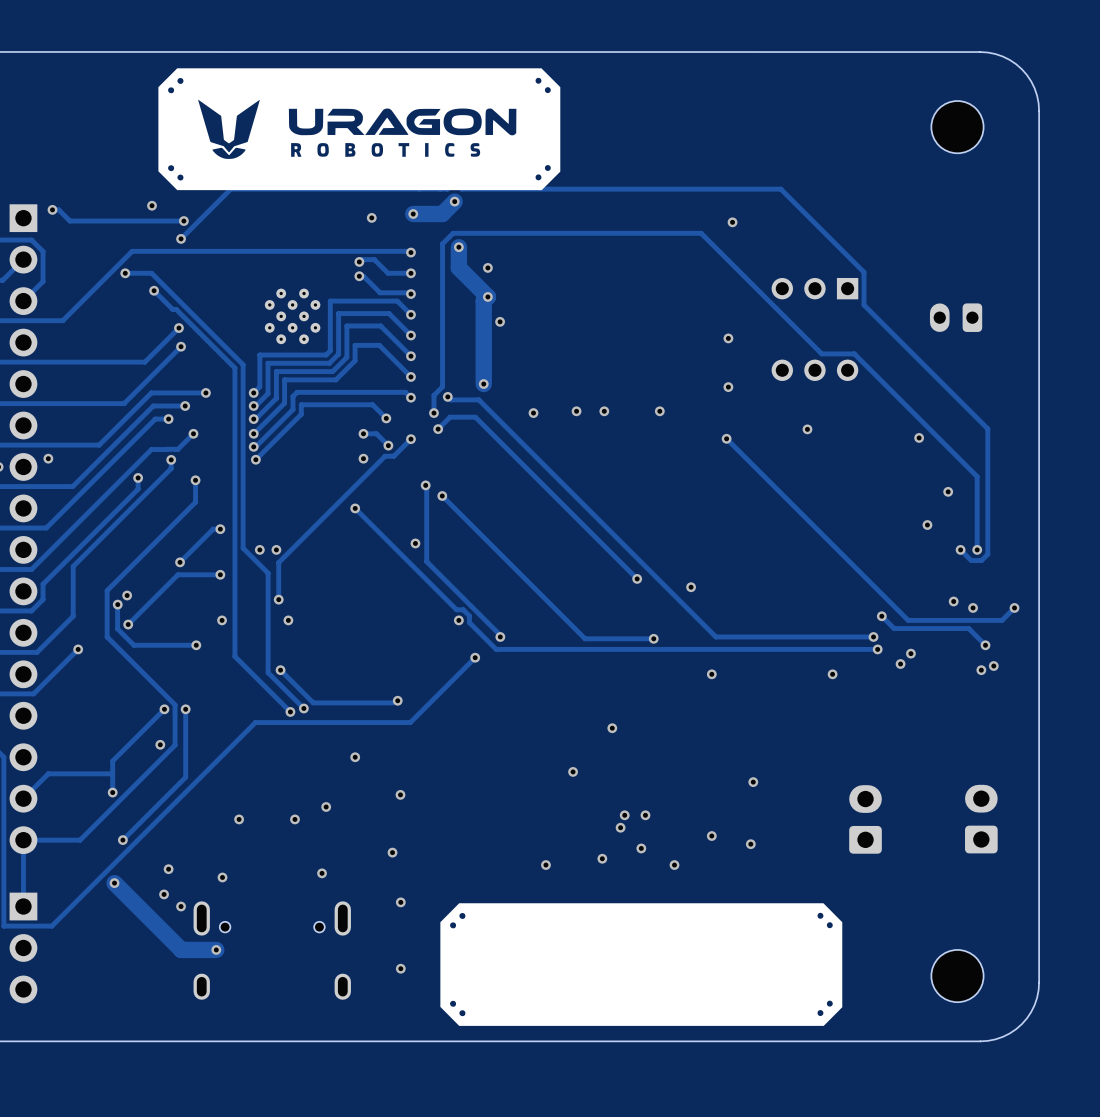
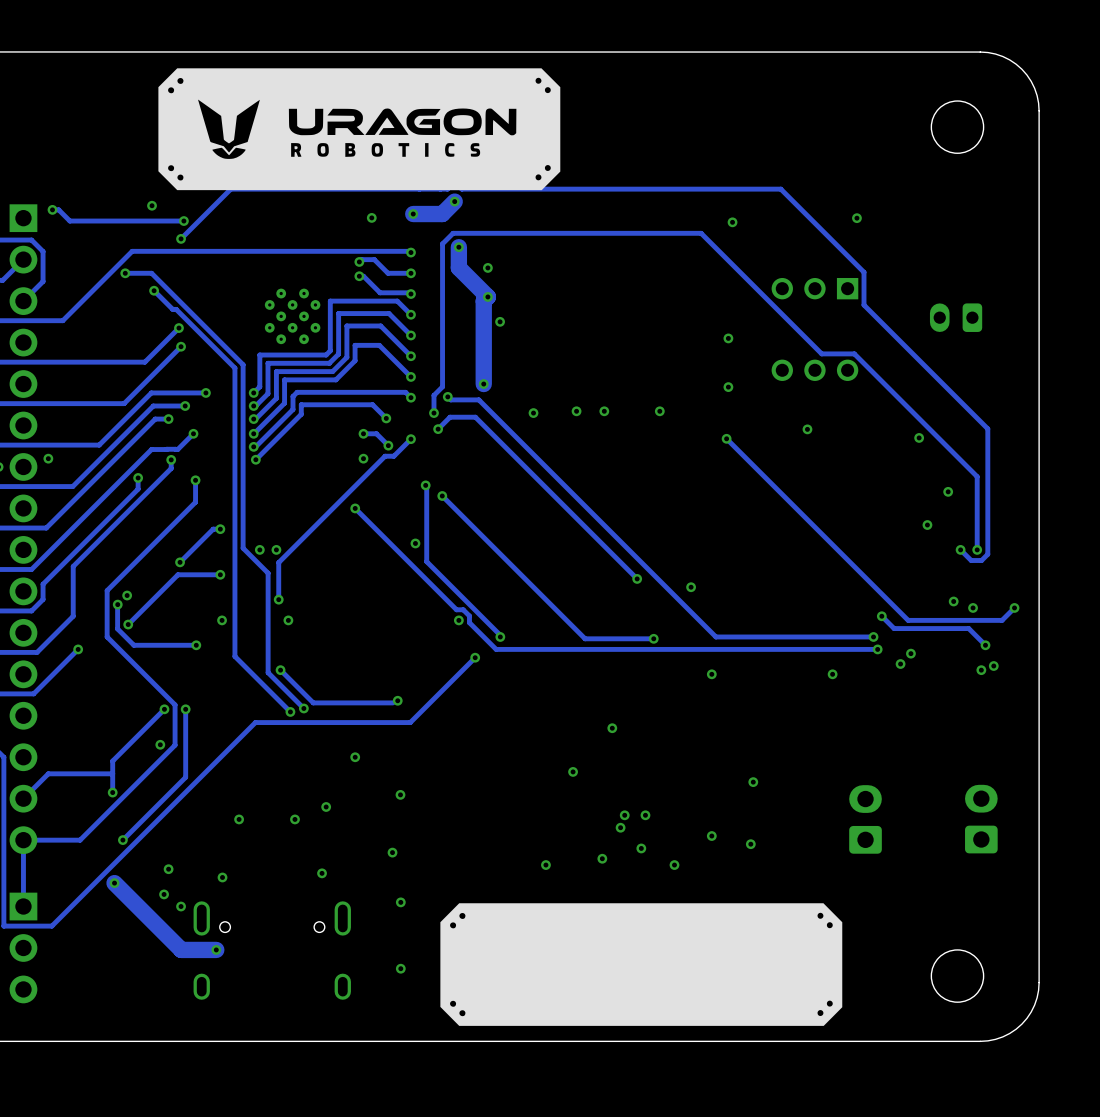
via: none -> (856, 218)

